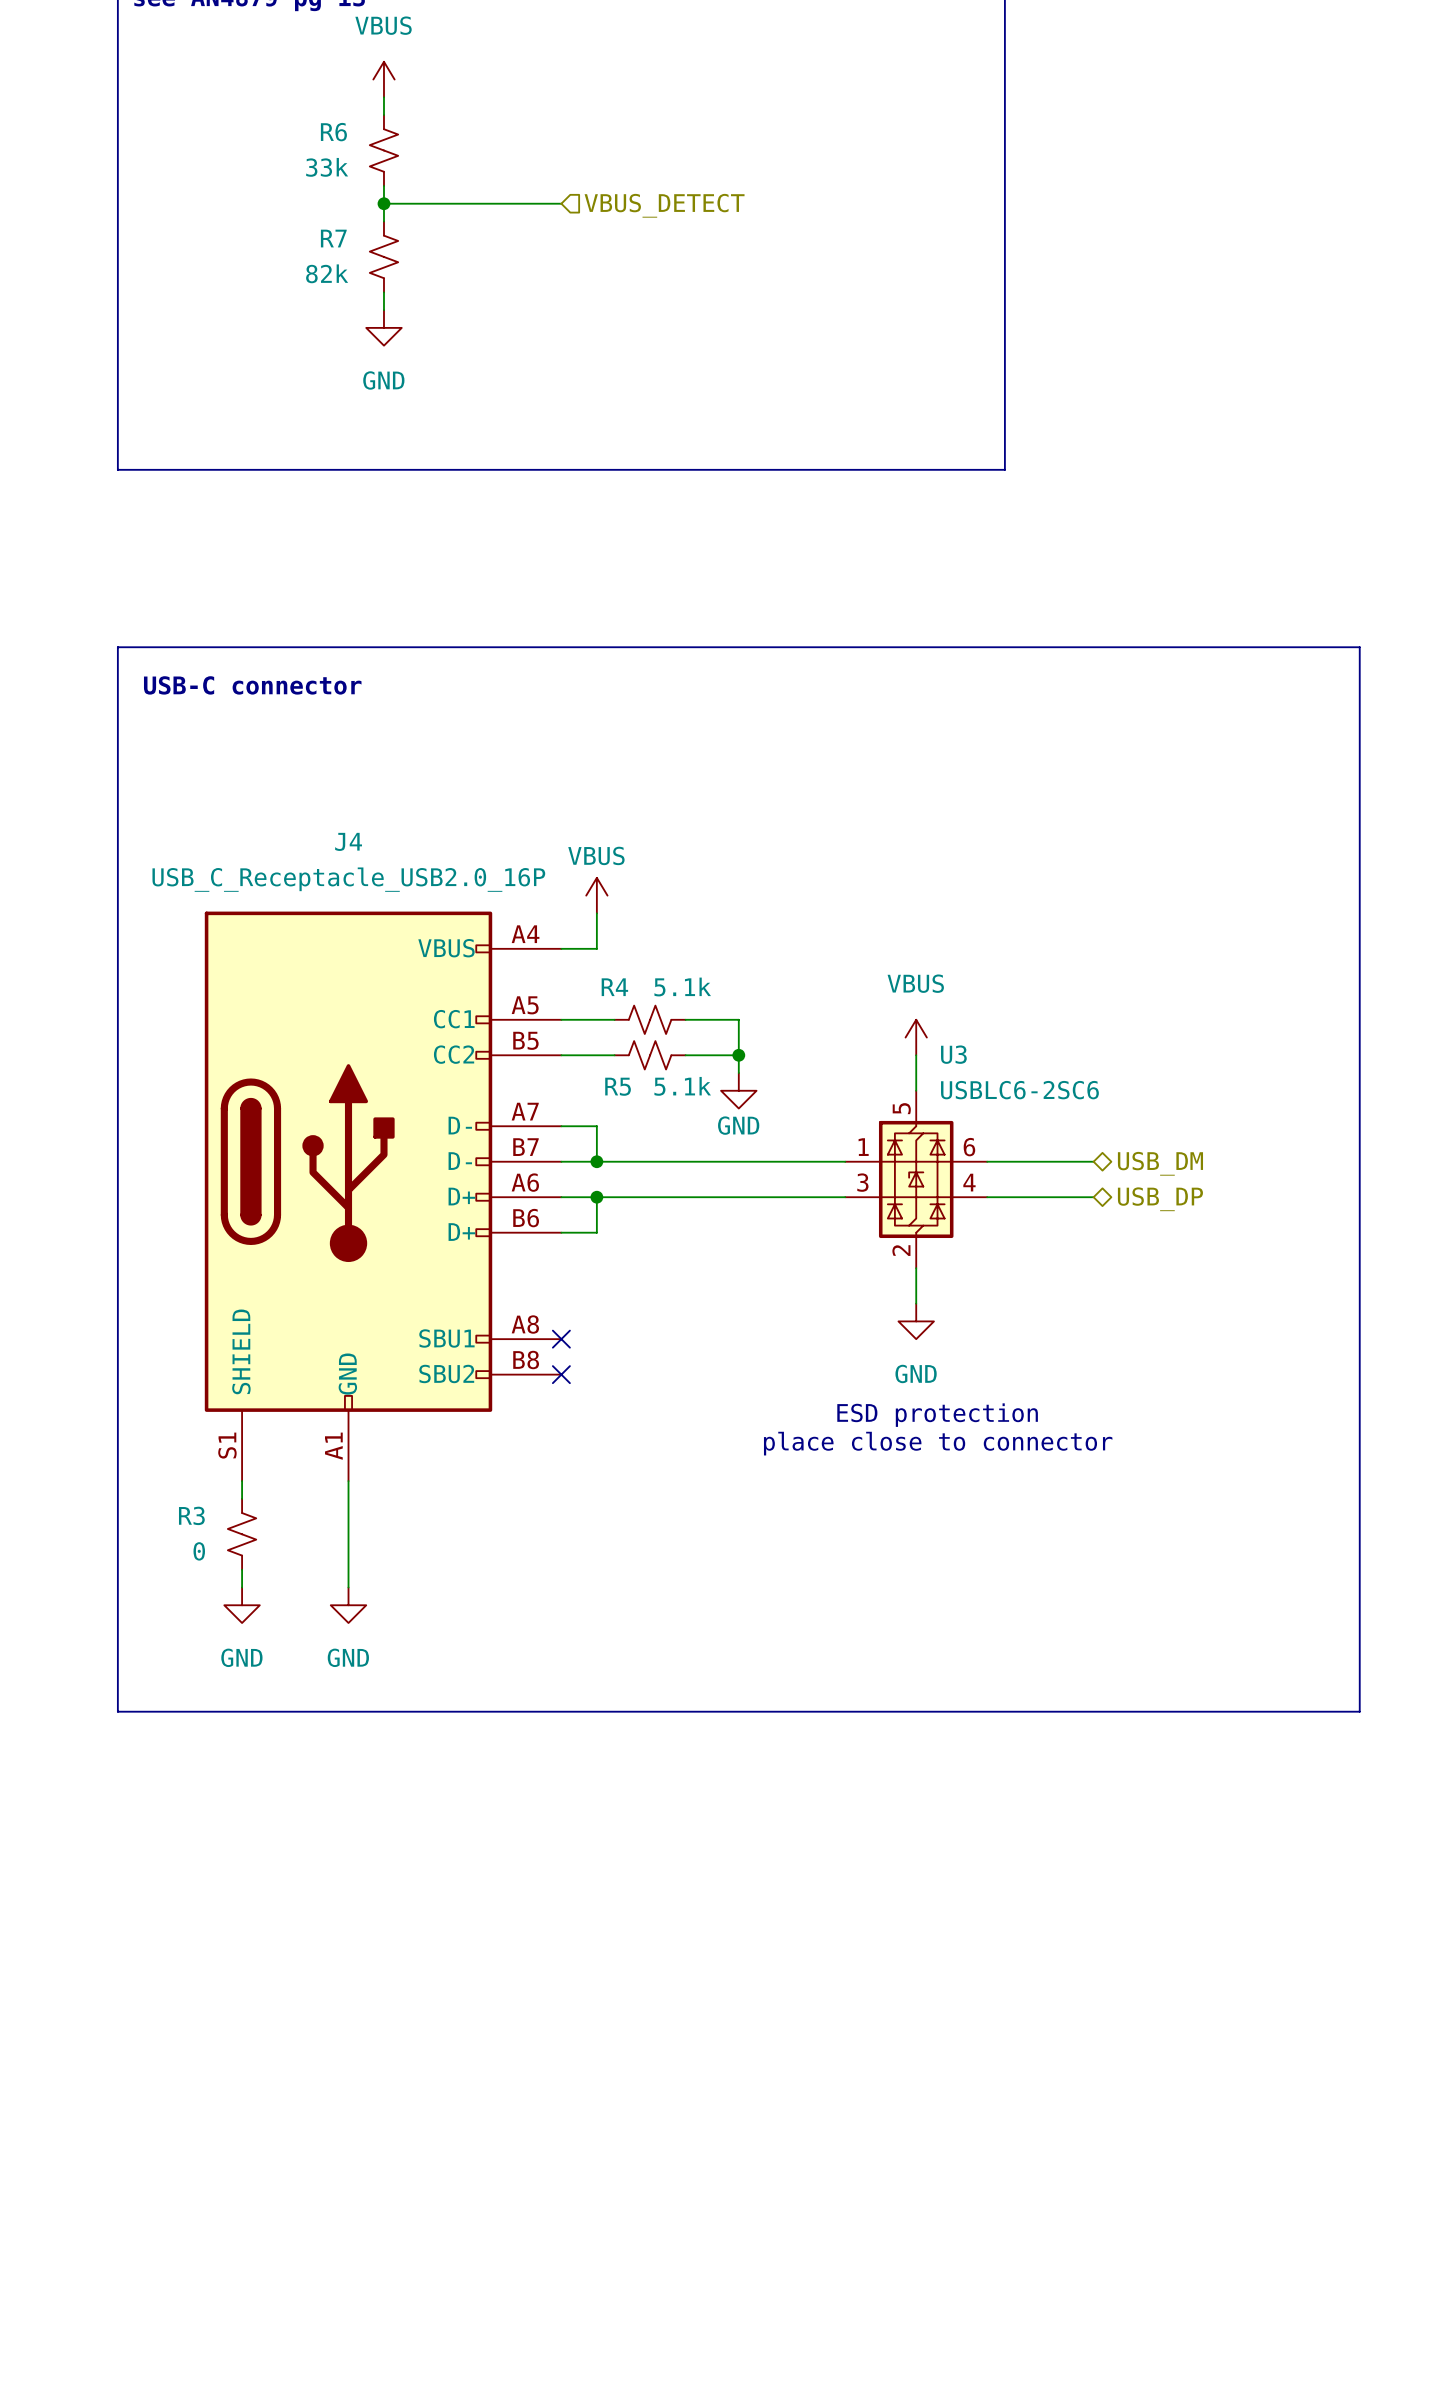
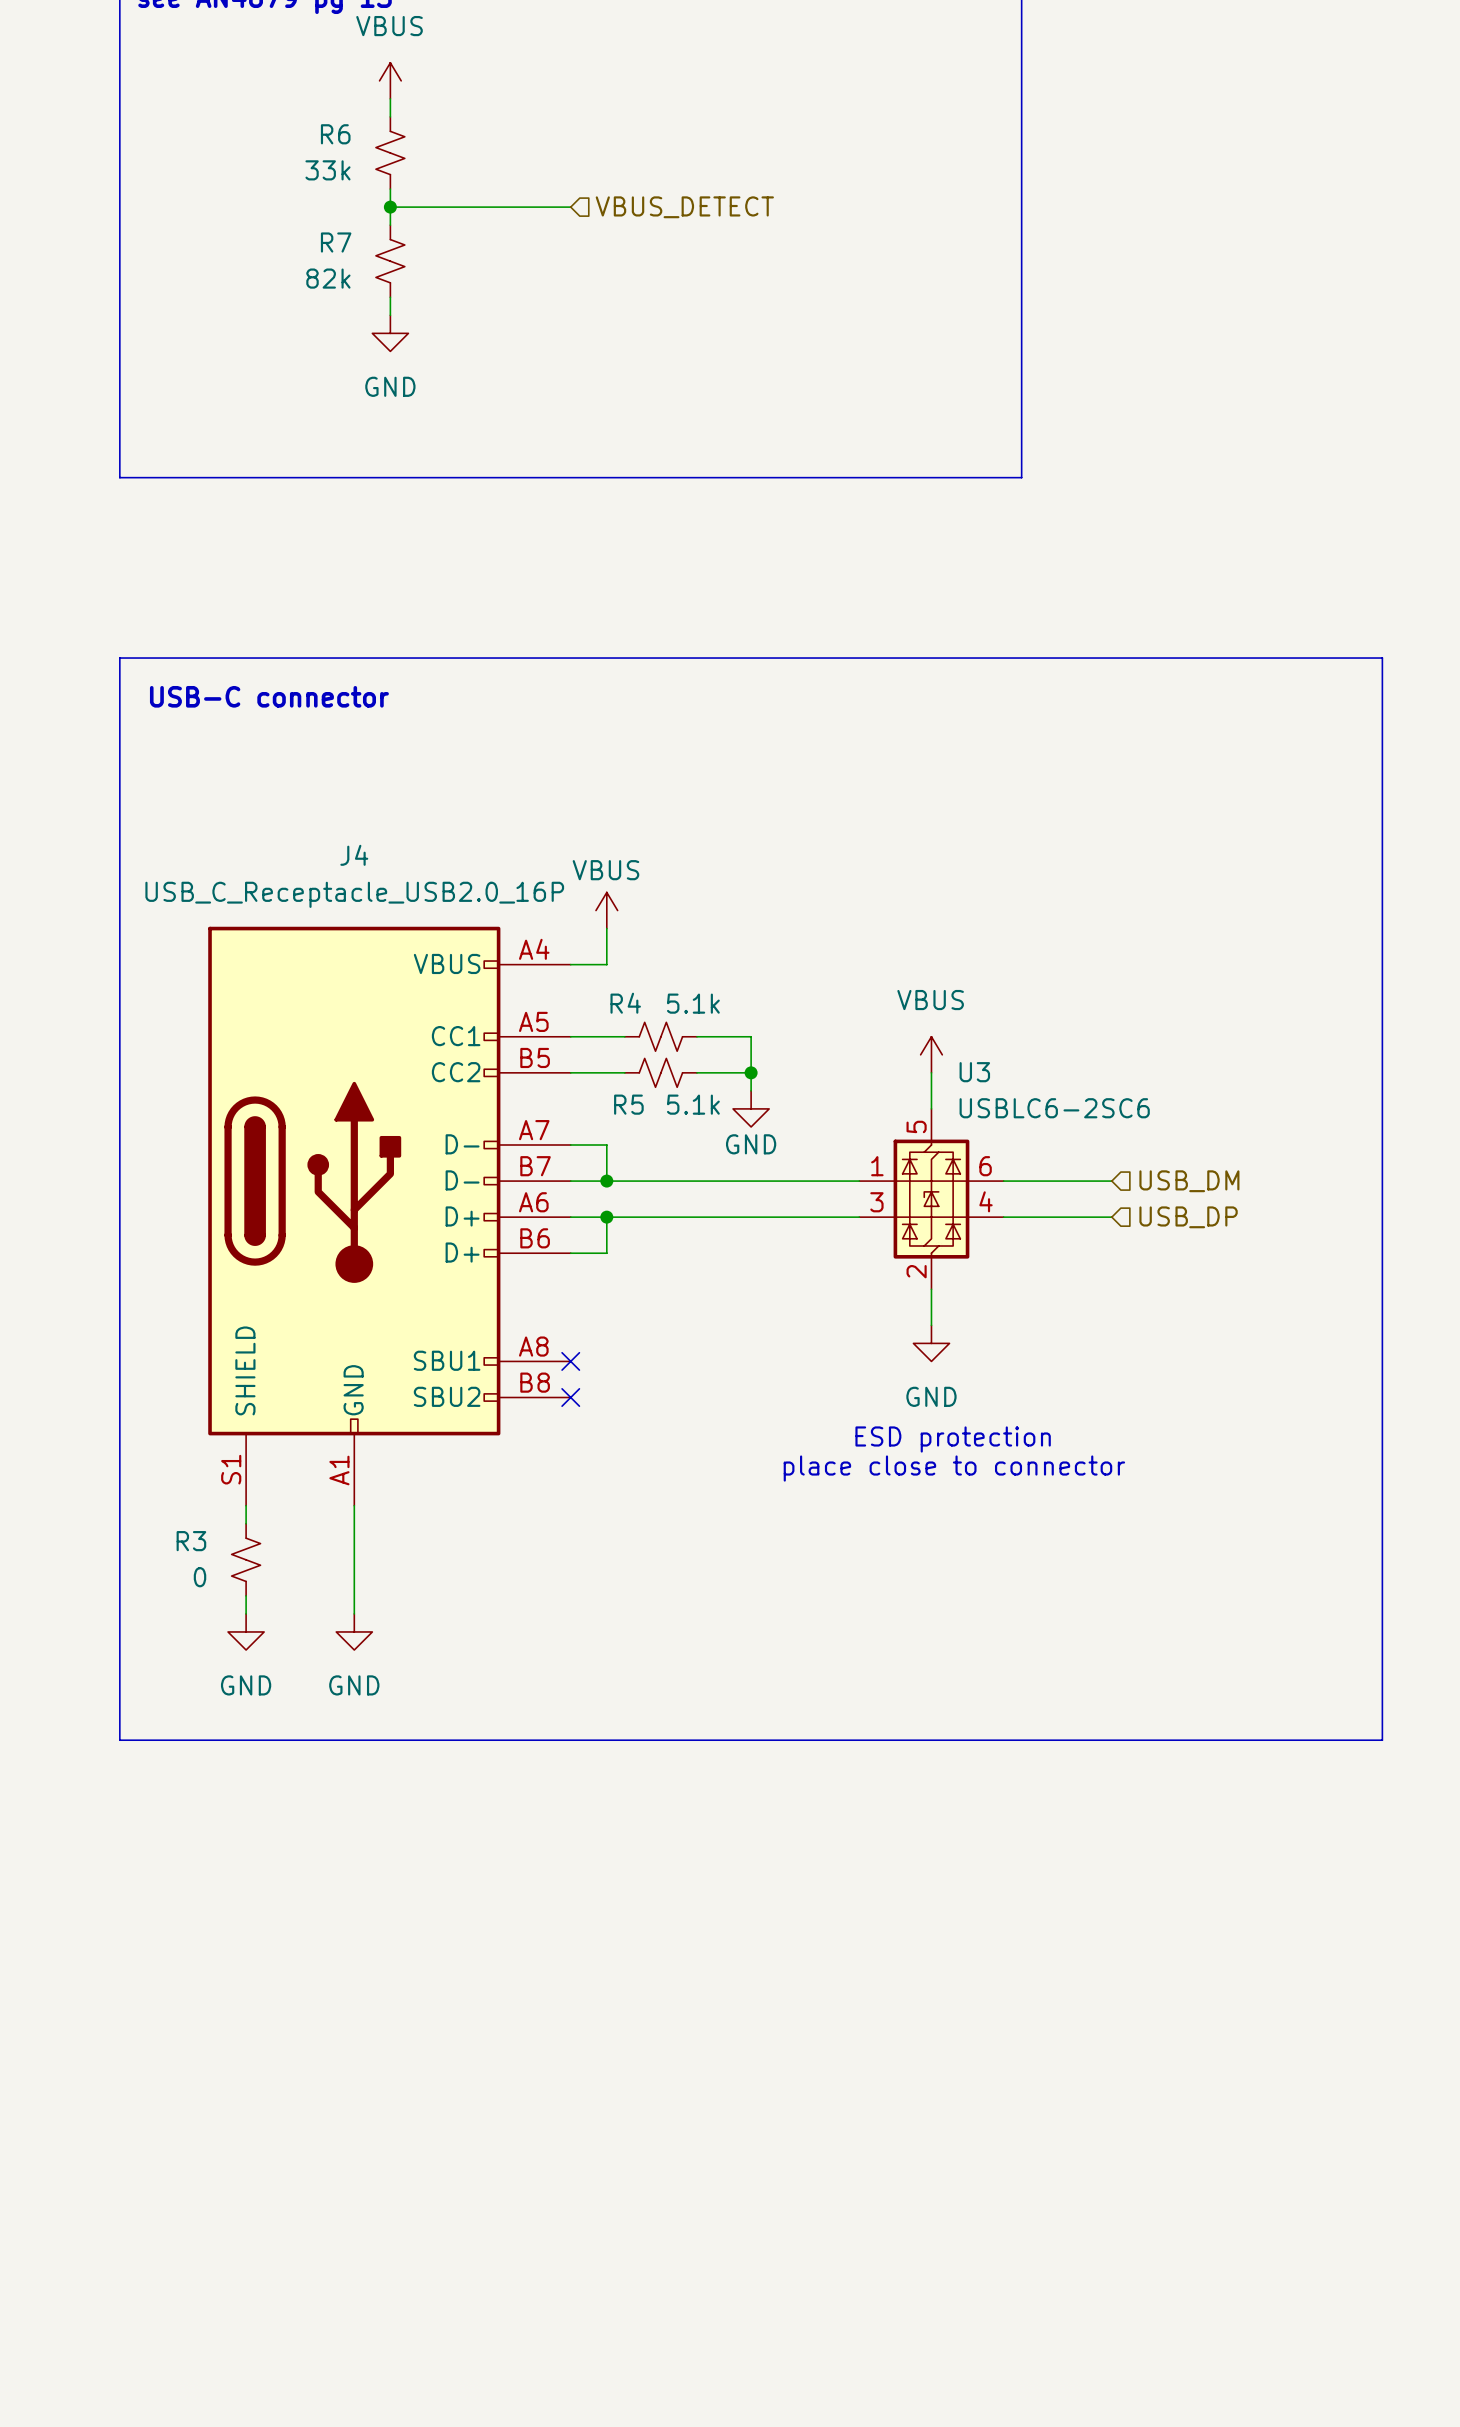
hierarchical label shape: bidirectional (1160, 1163) -> input (1189, 1181)
hierarchical label shape: bidirectional (1160, 1199) -> input (1188, 1217)

